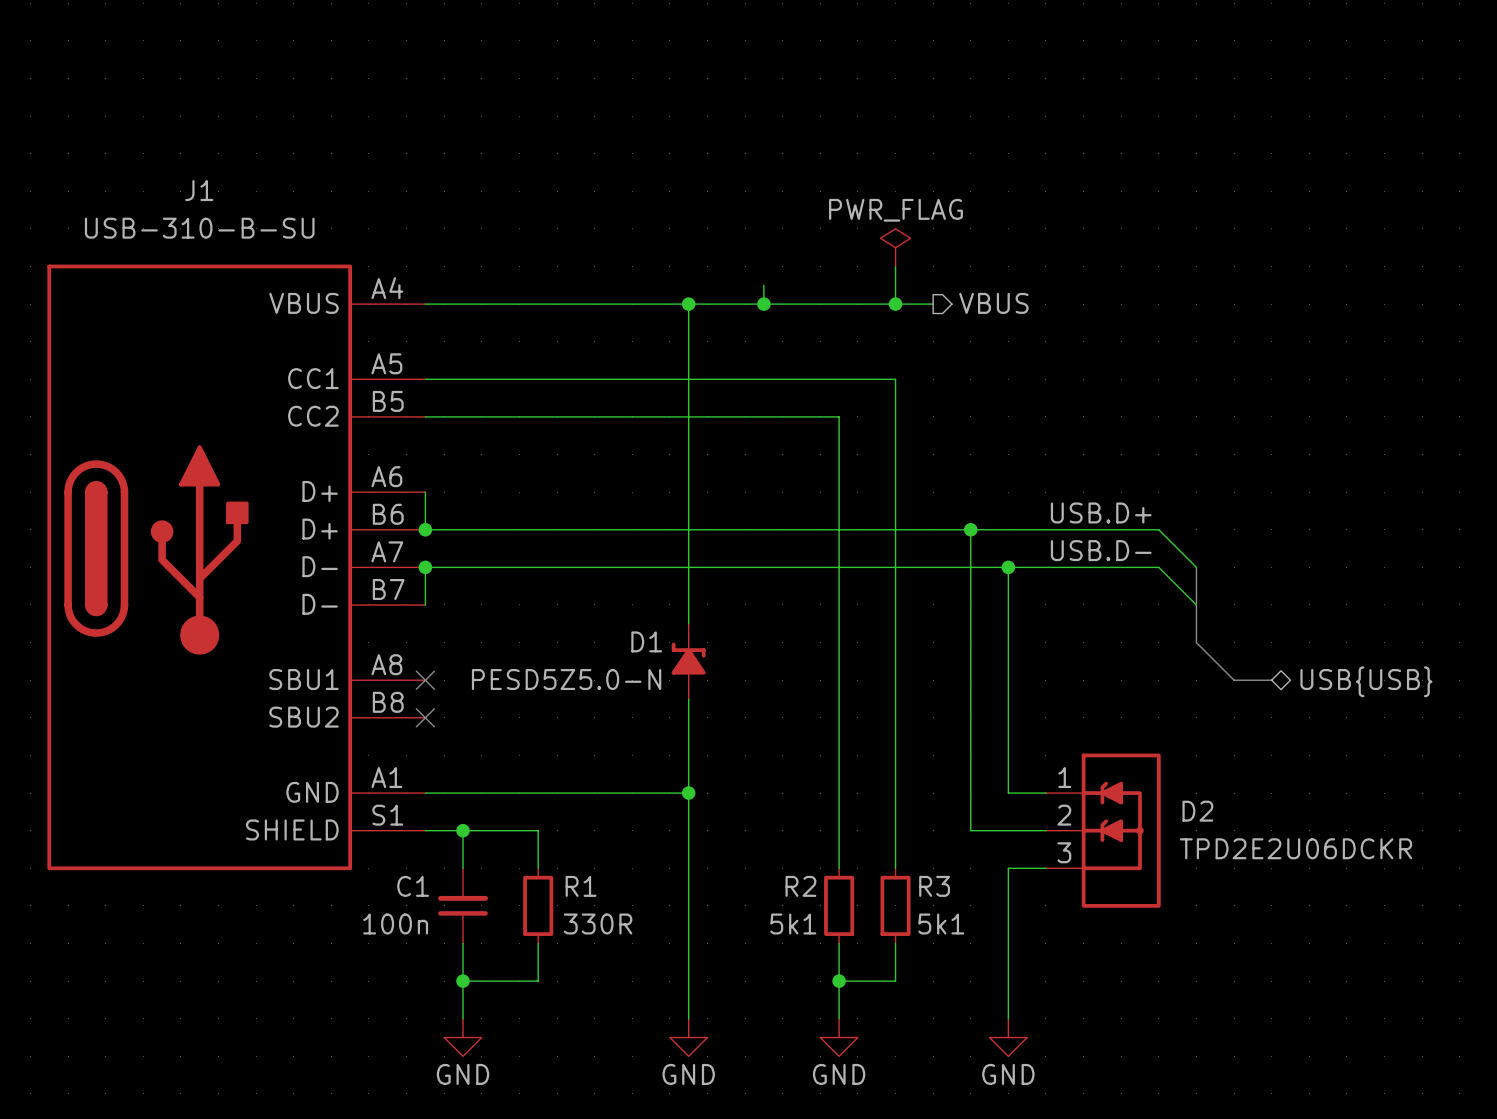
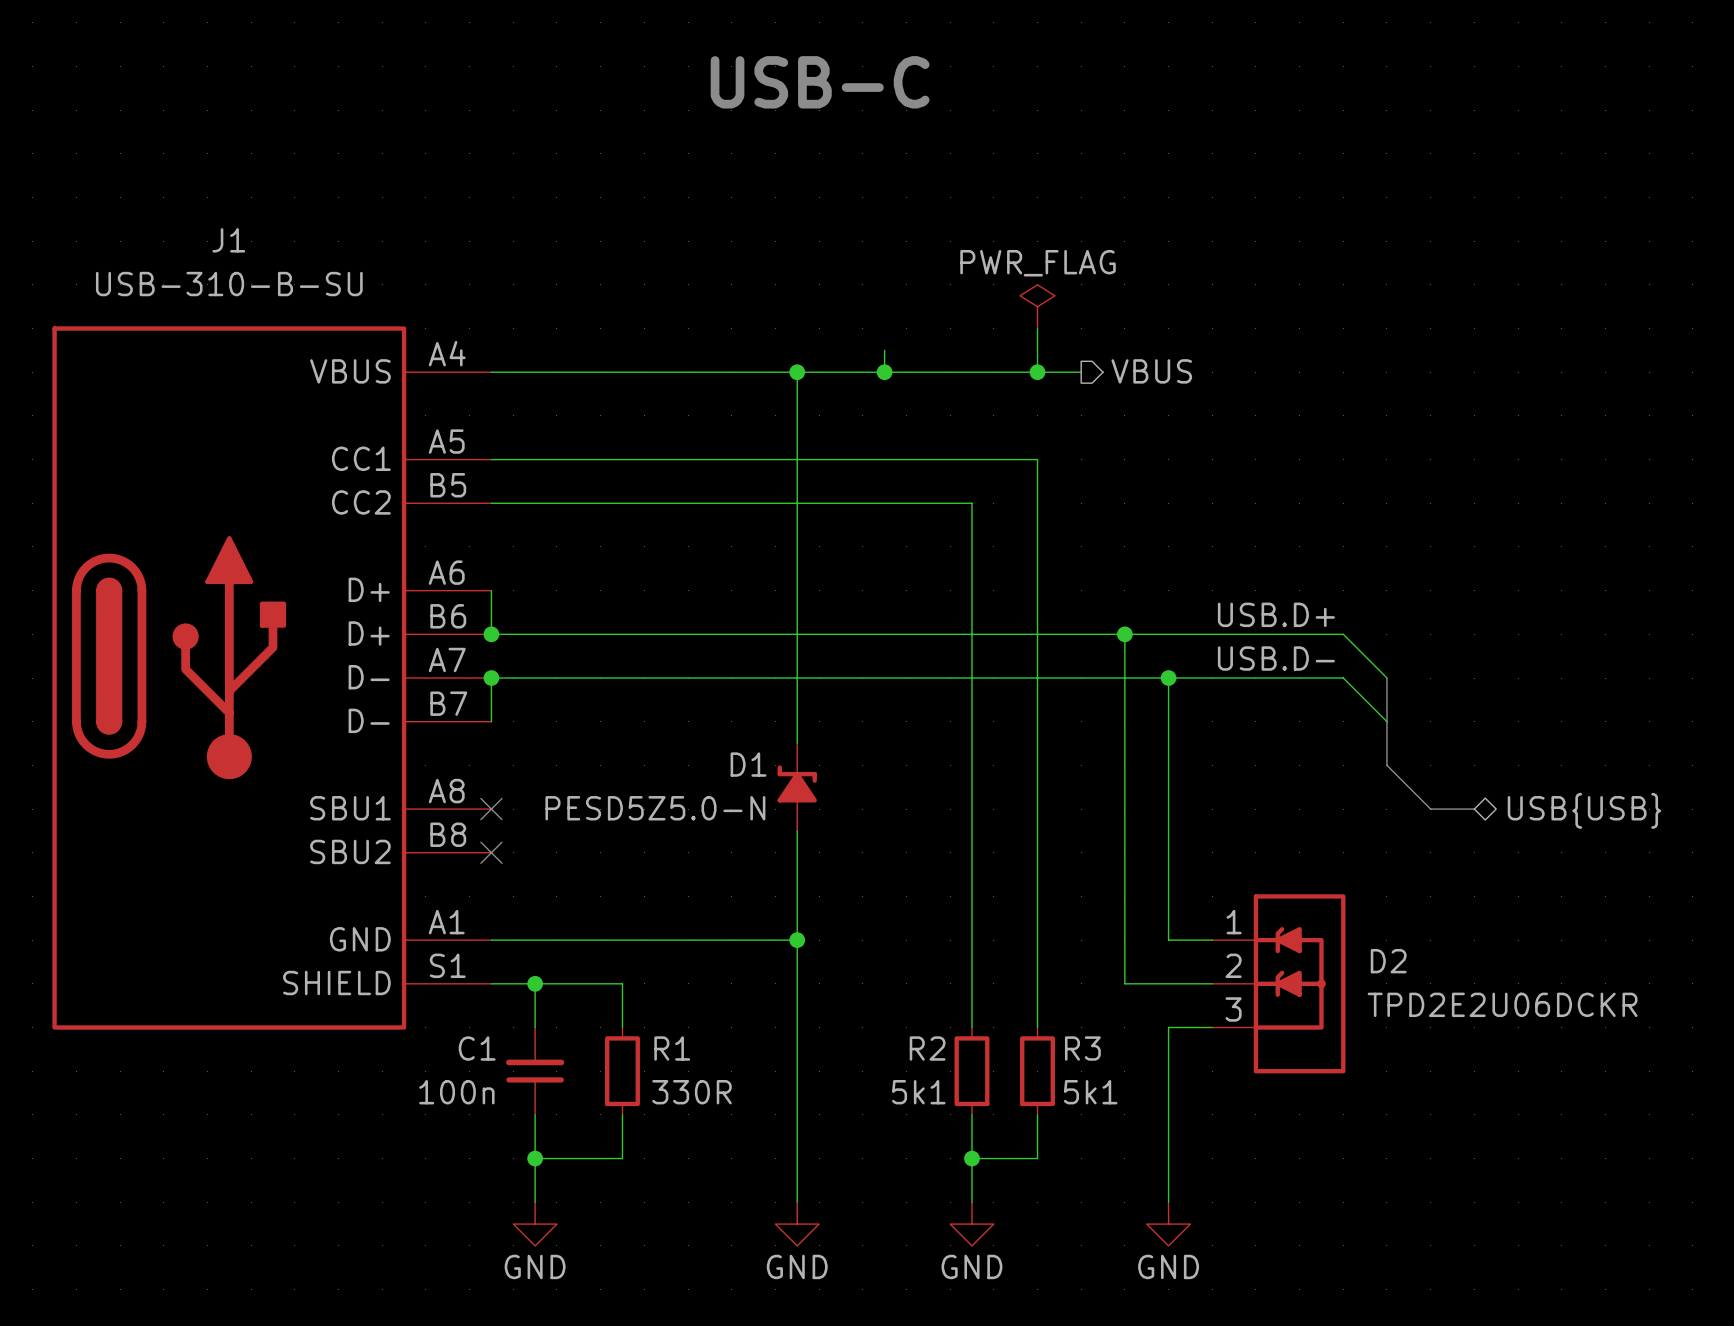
text: none -> USB-C (820, 82)

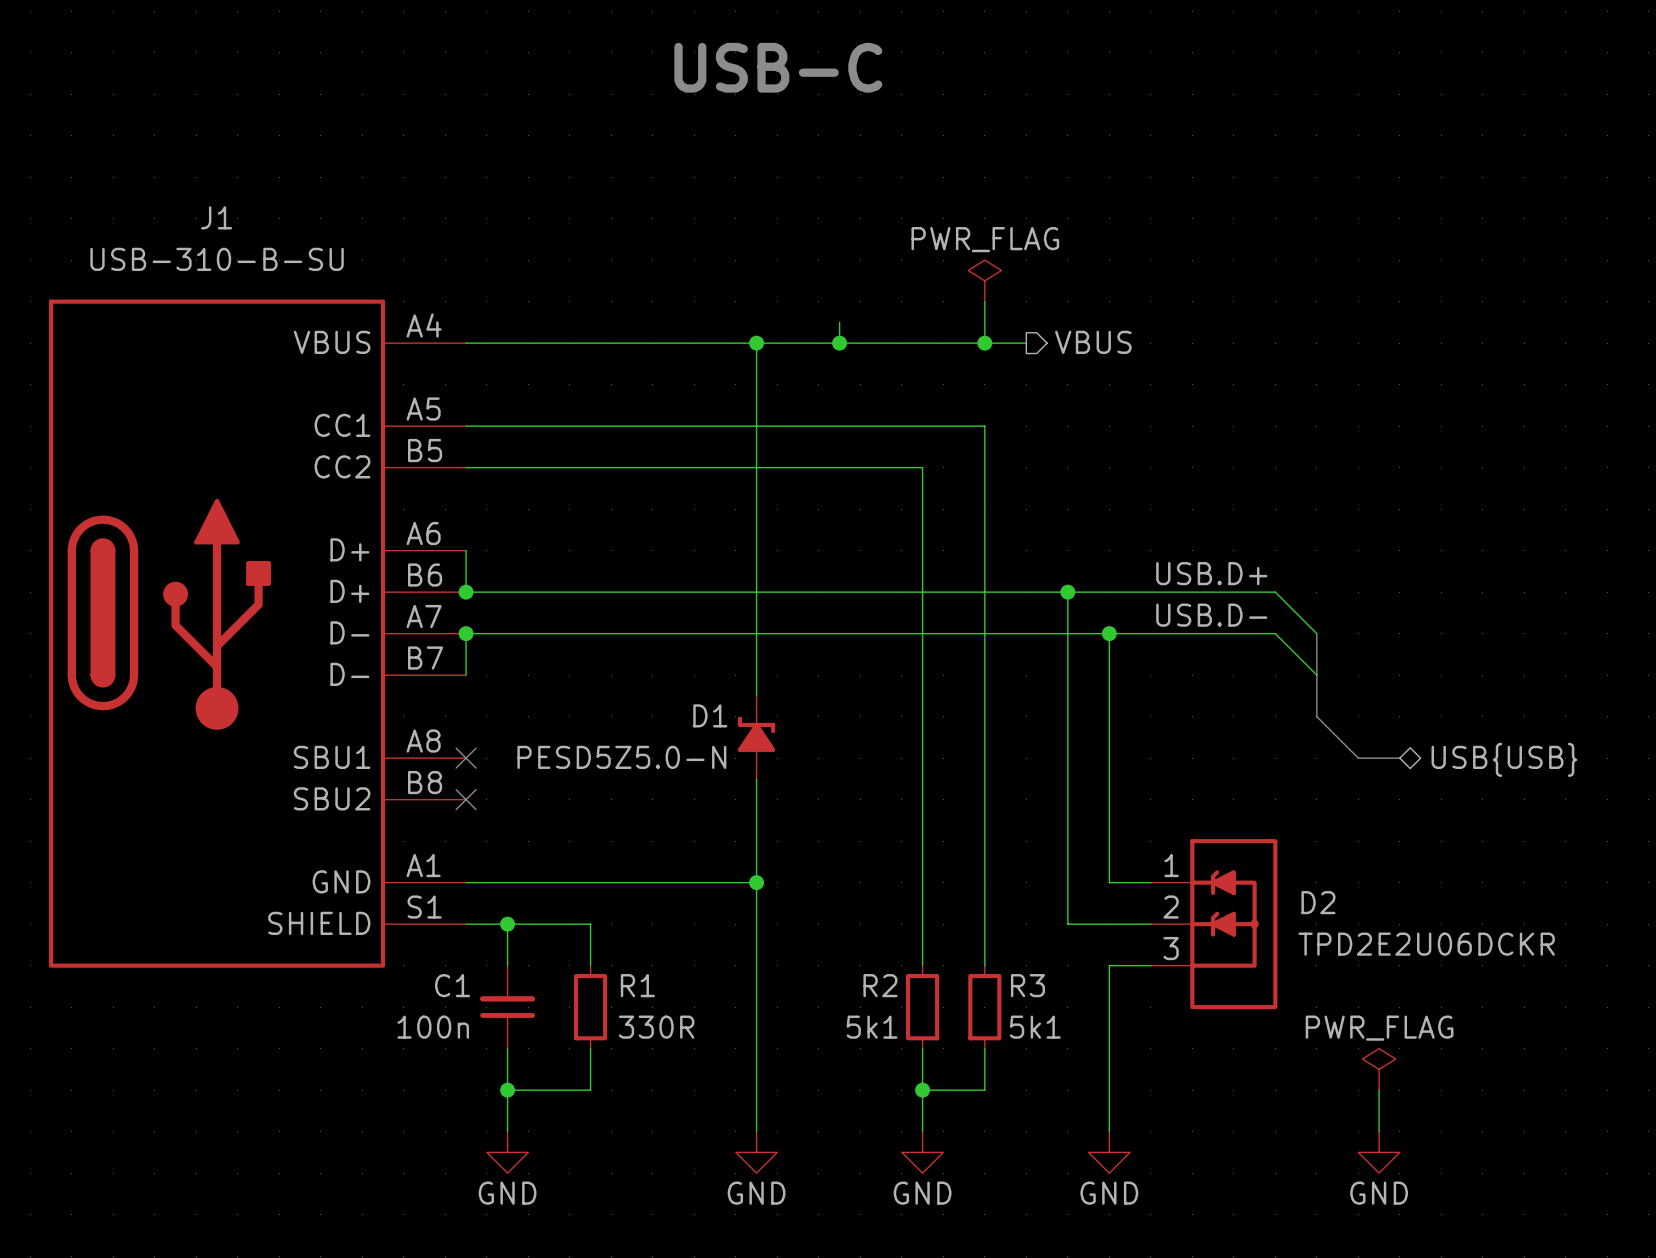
power symbol: none -> PWR_FLAG (1379, 1069)
wire: none -> (1379, 1090) (1379, 1131)
power symbol: none -> GND (1379, 1152)

